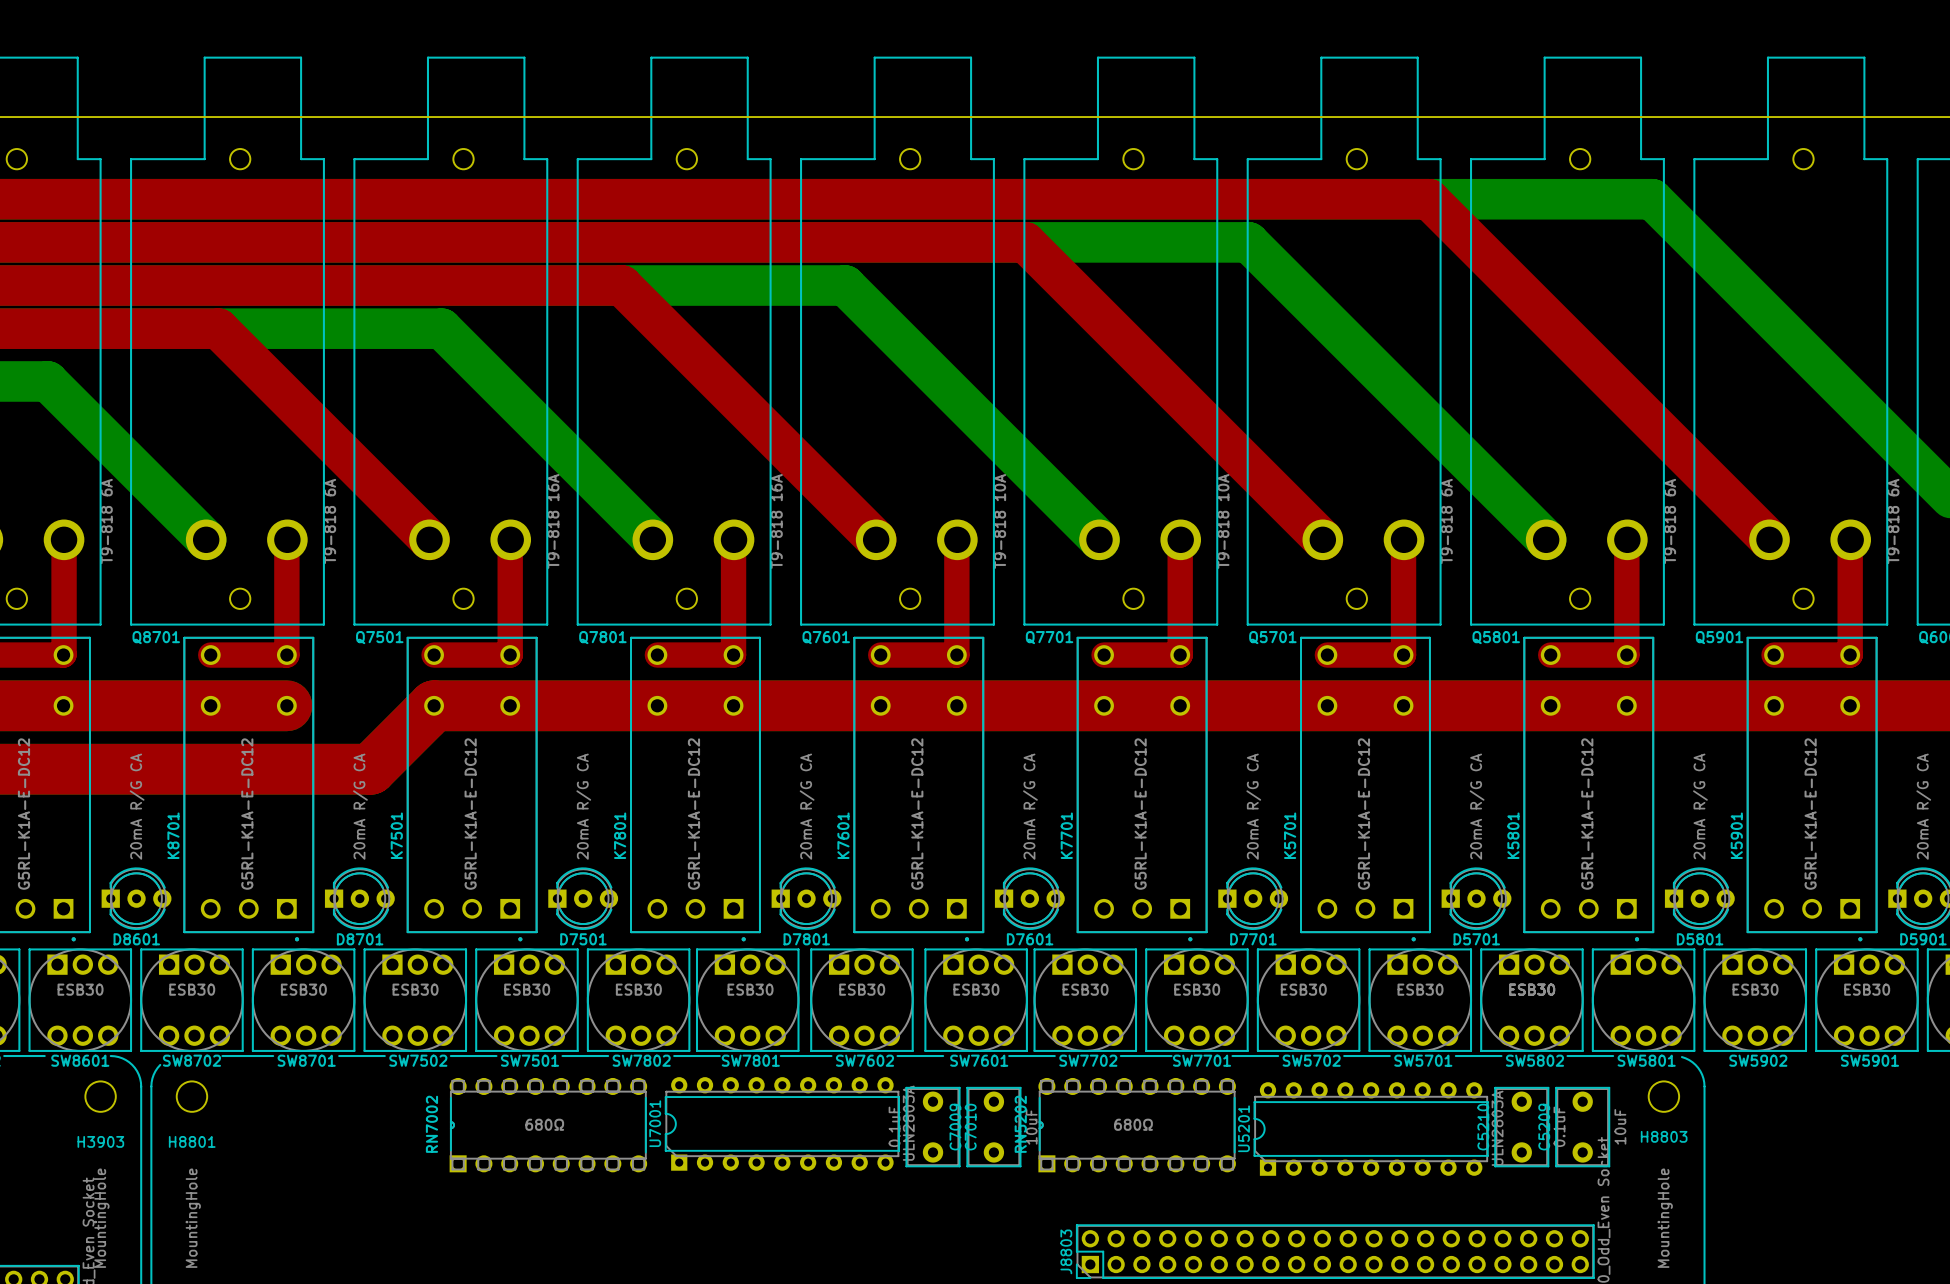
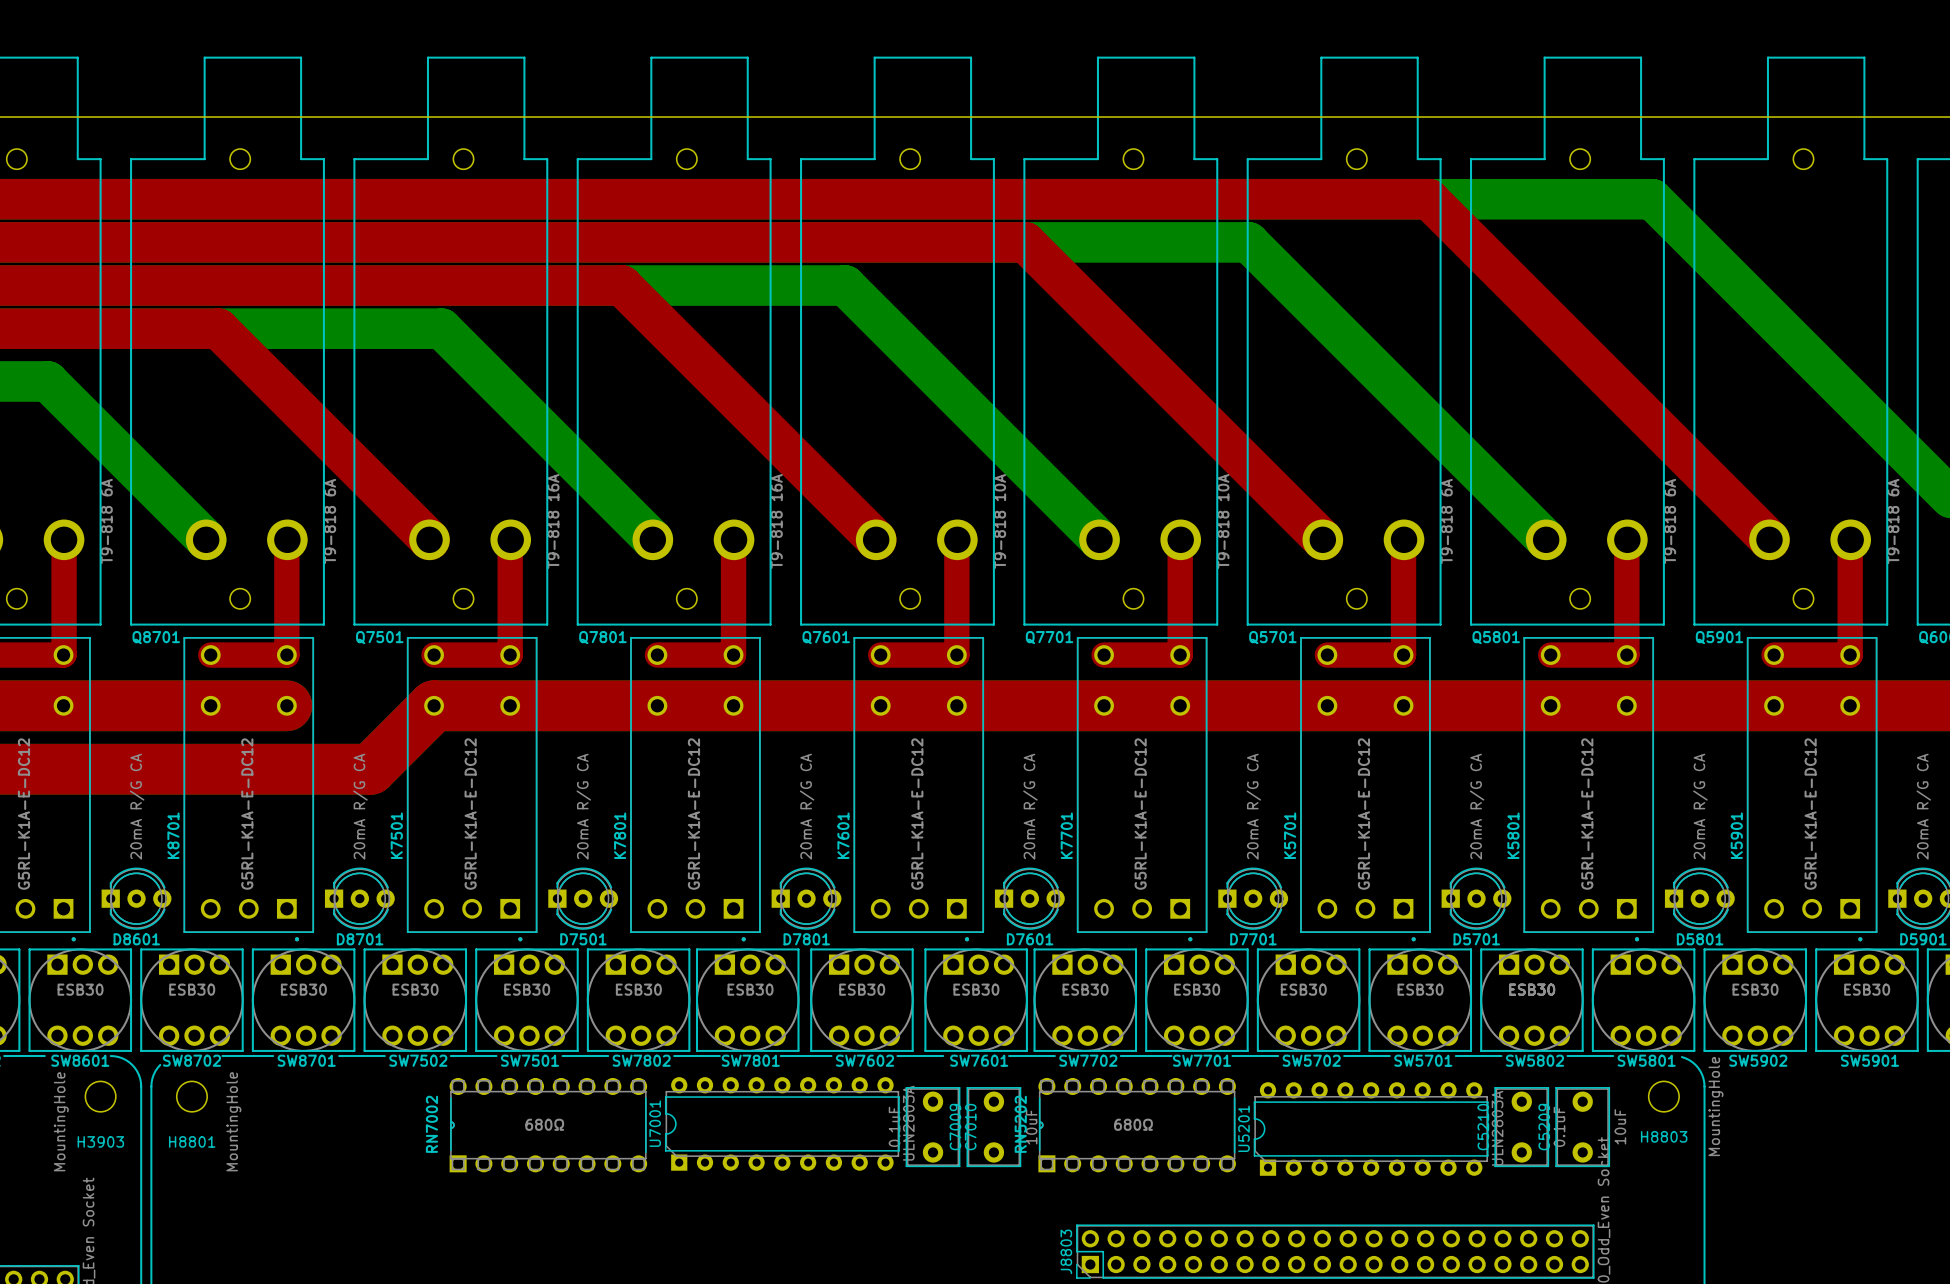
H3903 value position: MountingHole (101, 1218) -> MountingHole (61, 1121)
H8801 value position: MountingHole (193, 1218) -> MountingHole (233, 1121)
H8803 value position: MountingHole (1665, 1218) -> MountingHole (1715, 1106)

